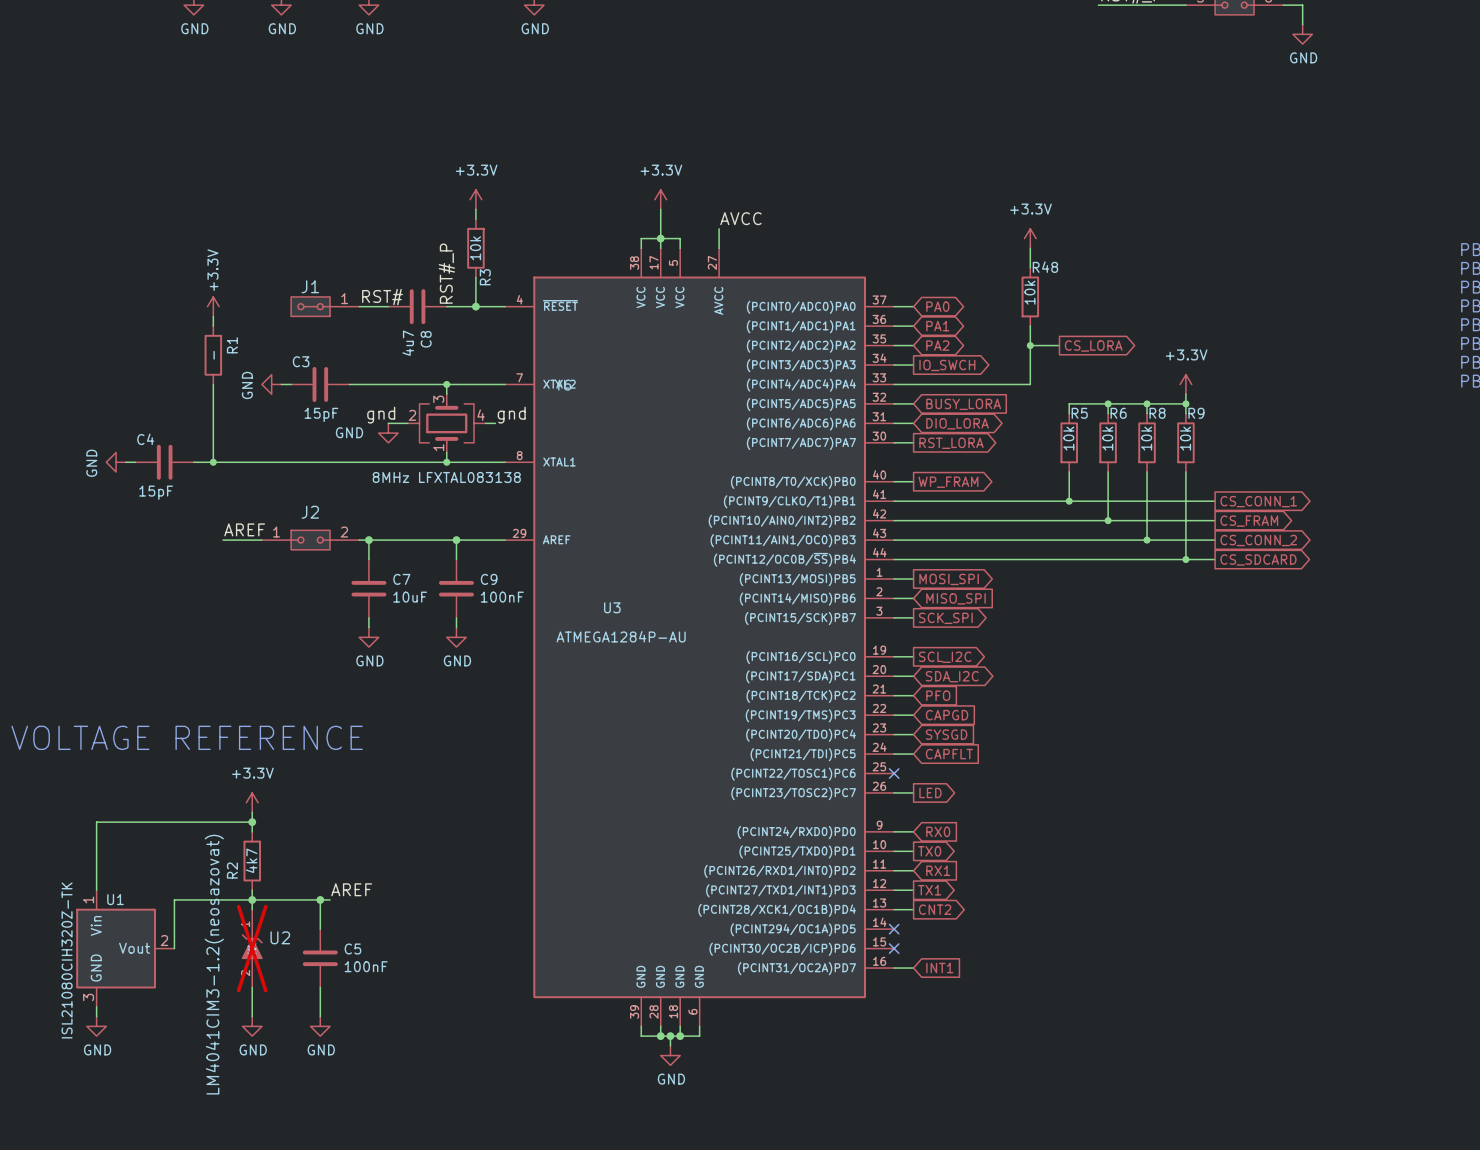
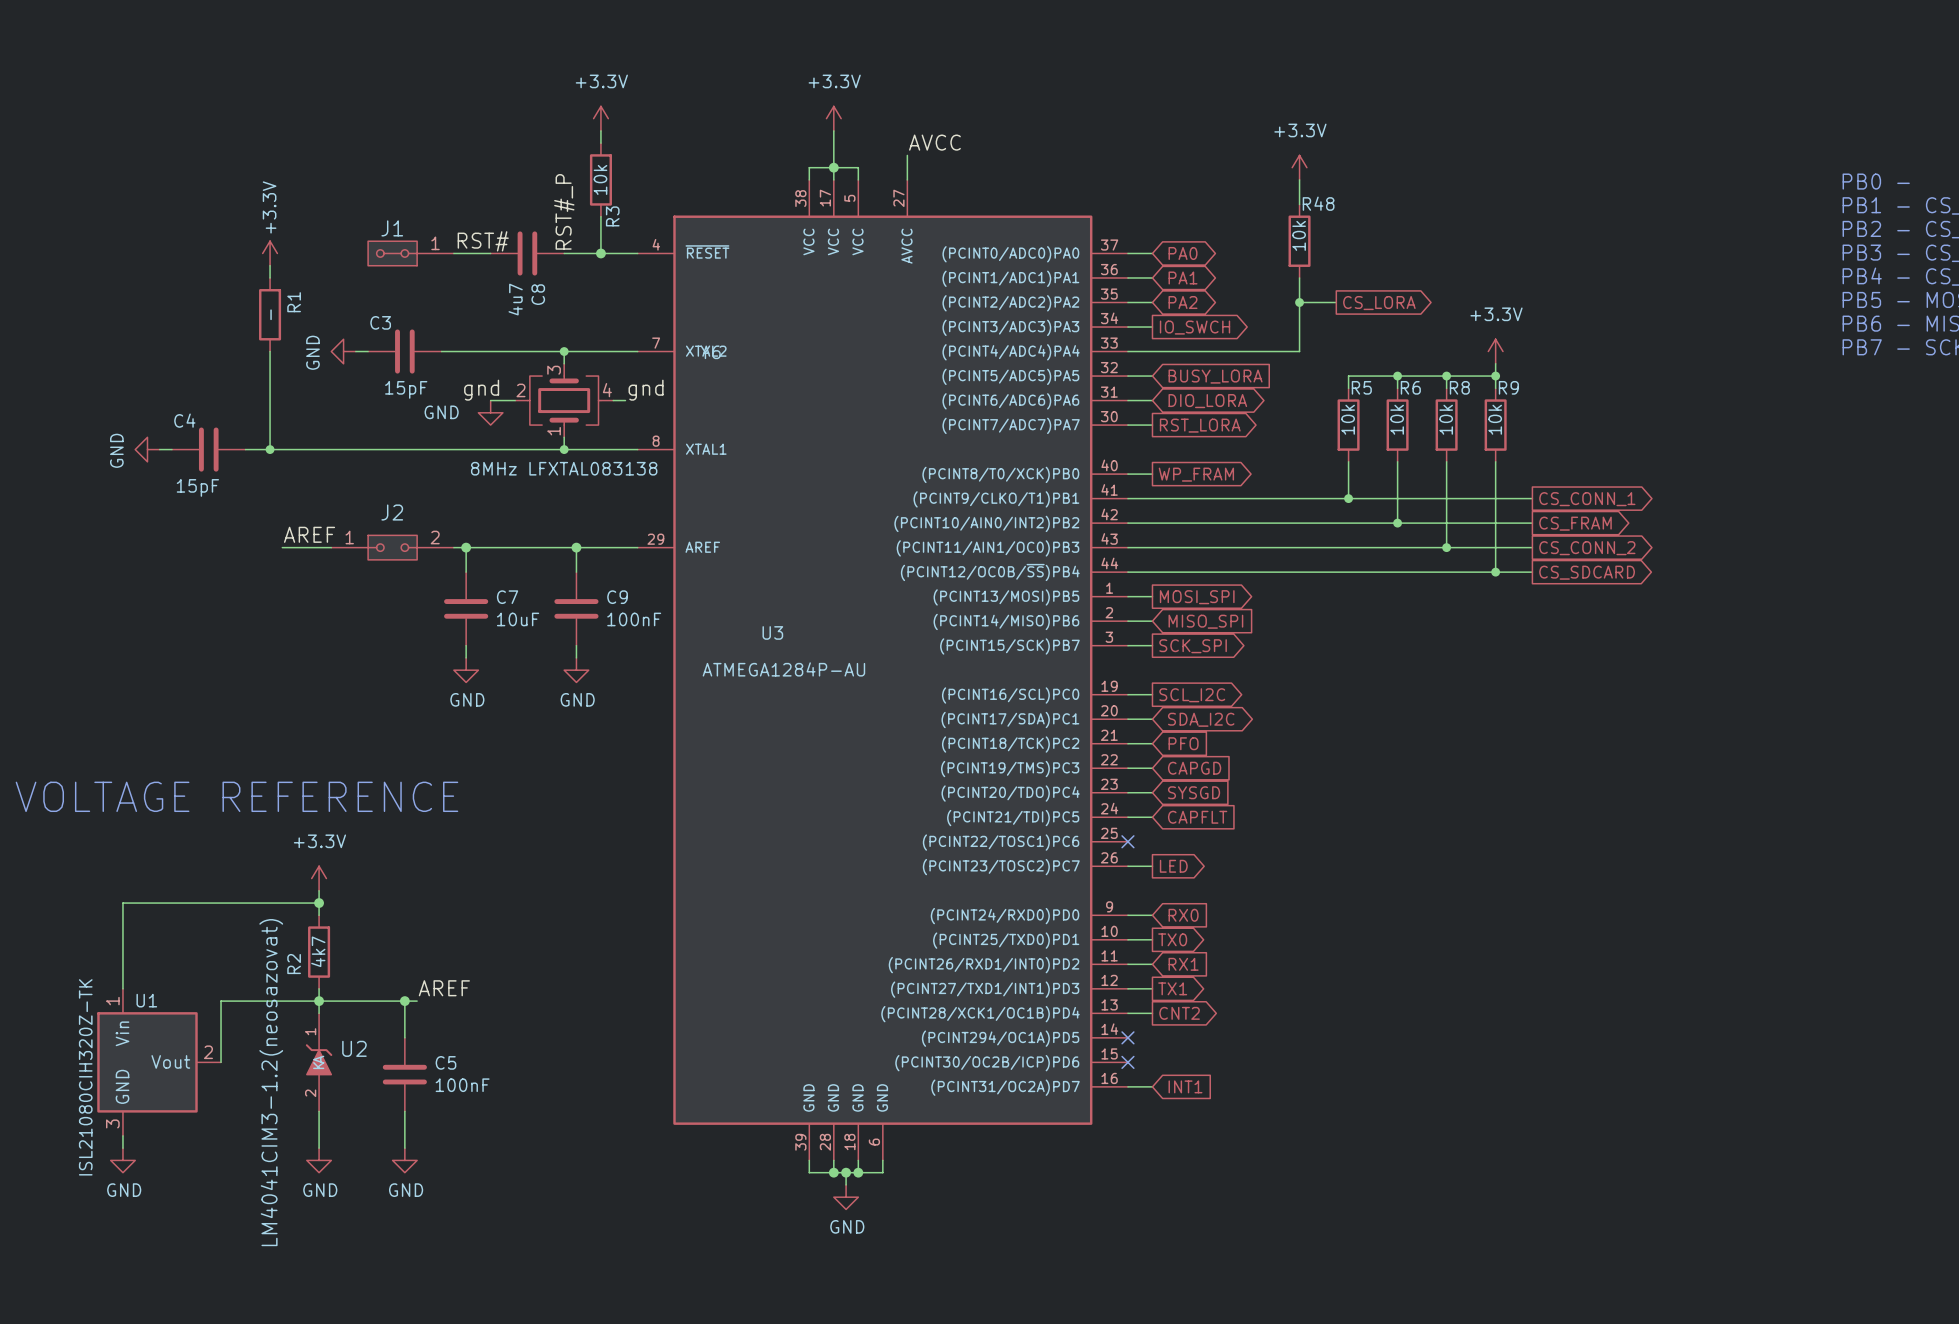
U2 do-not-place cross: (252, 948) -> none

